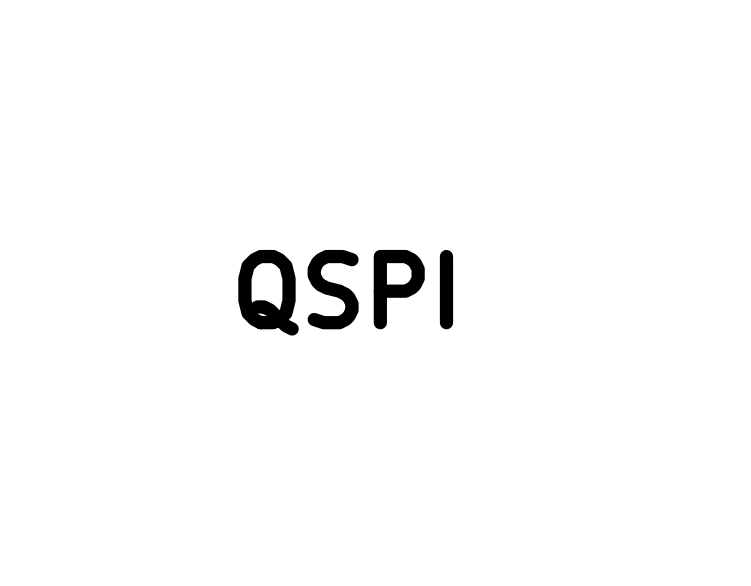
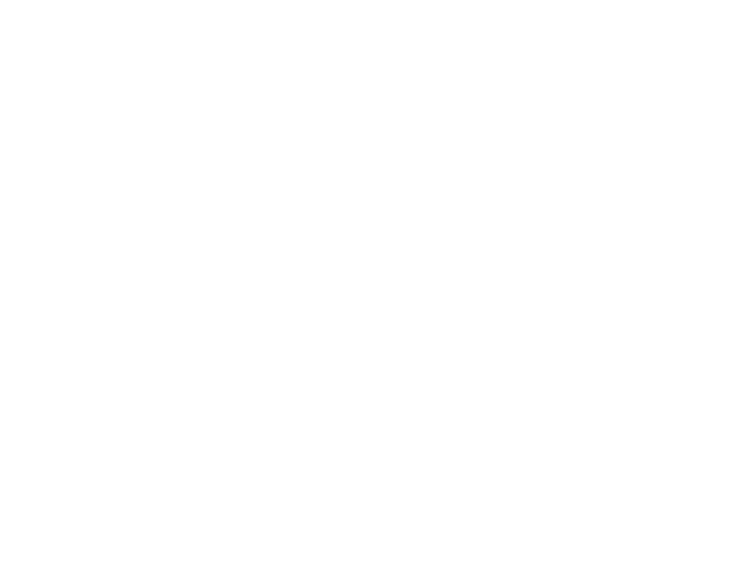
label: QSPI (345, 292) -> none

